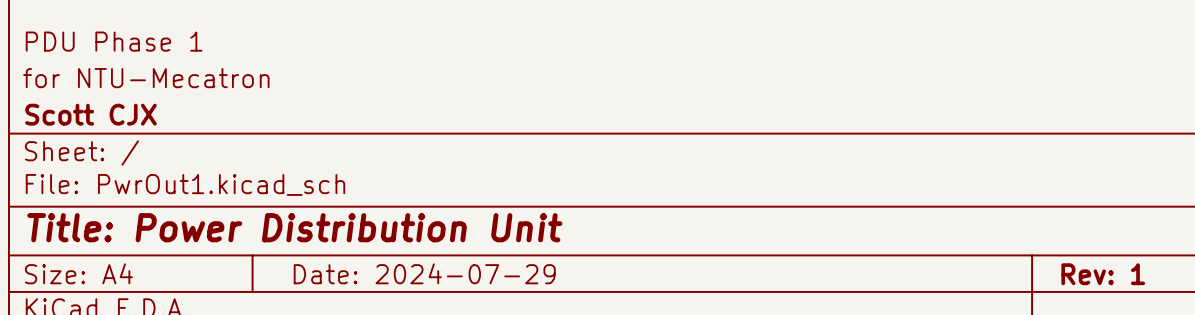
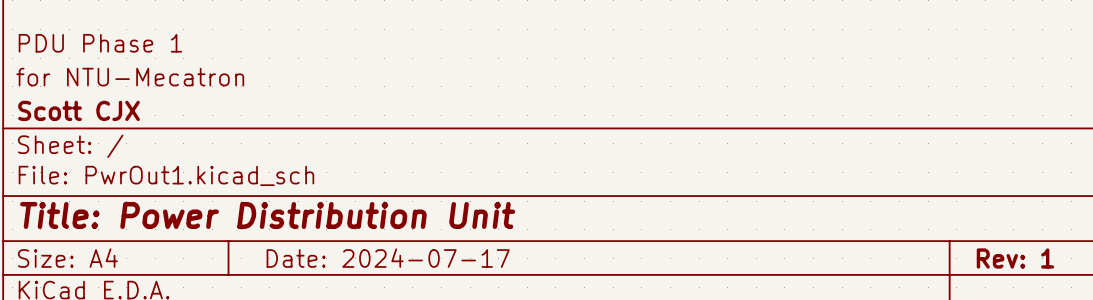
title block: Date: 2024-07-29 (424, 273) -> Date: 2024-07-17 (388, 258)

